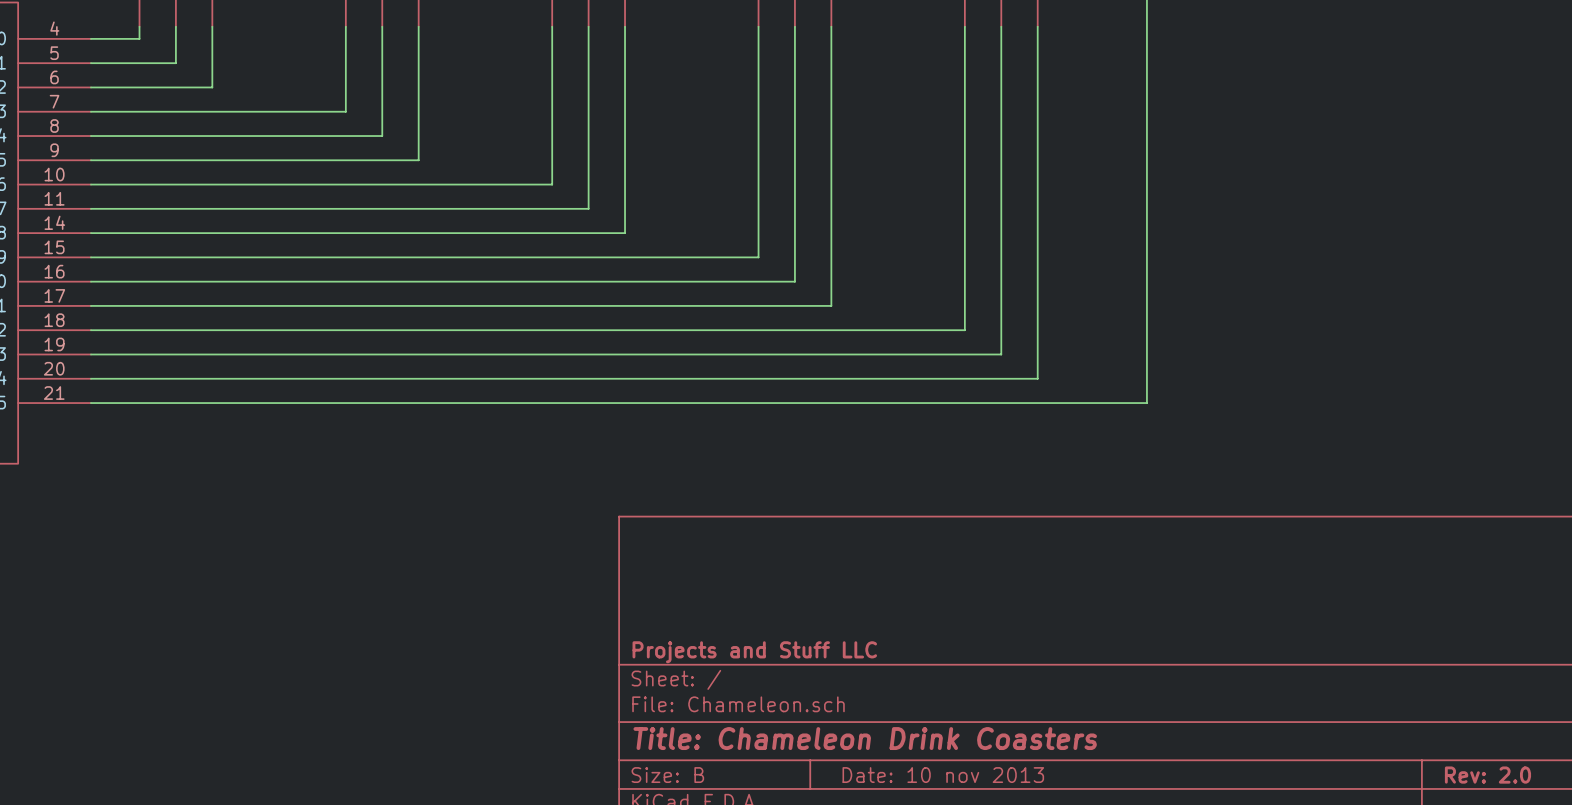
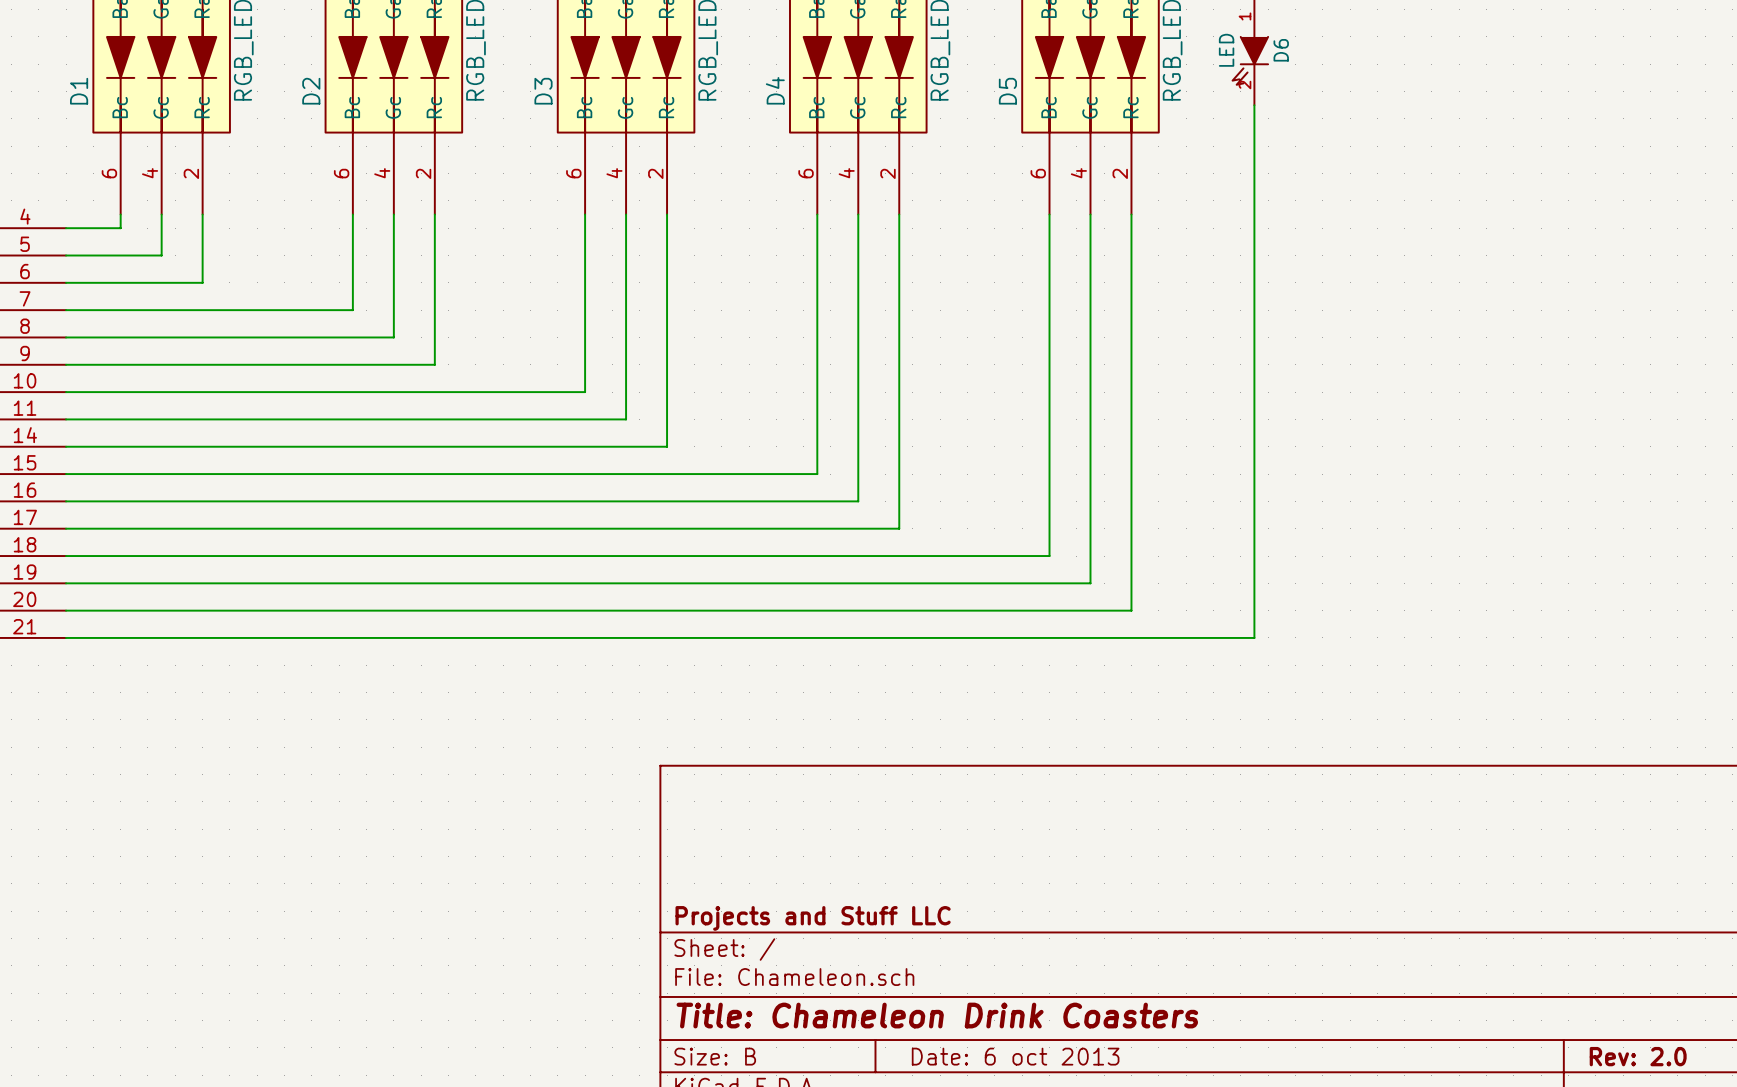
title block: Date: 10 nov 2013 (943, 775) -> Date: 6 oct 2013 (1015, 1056)

